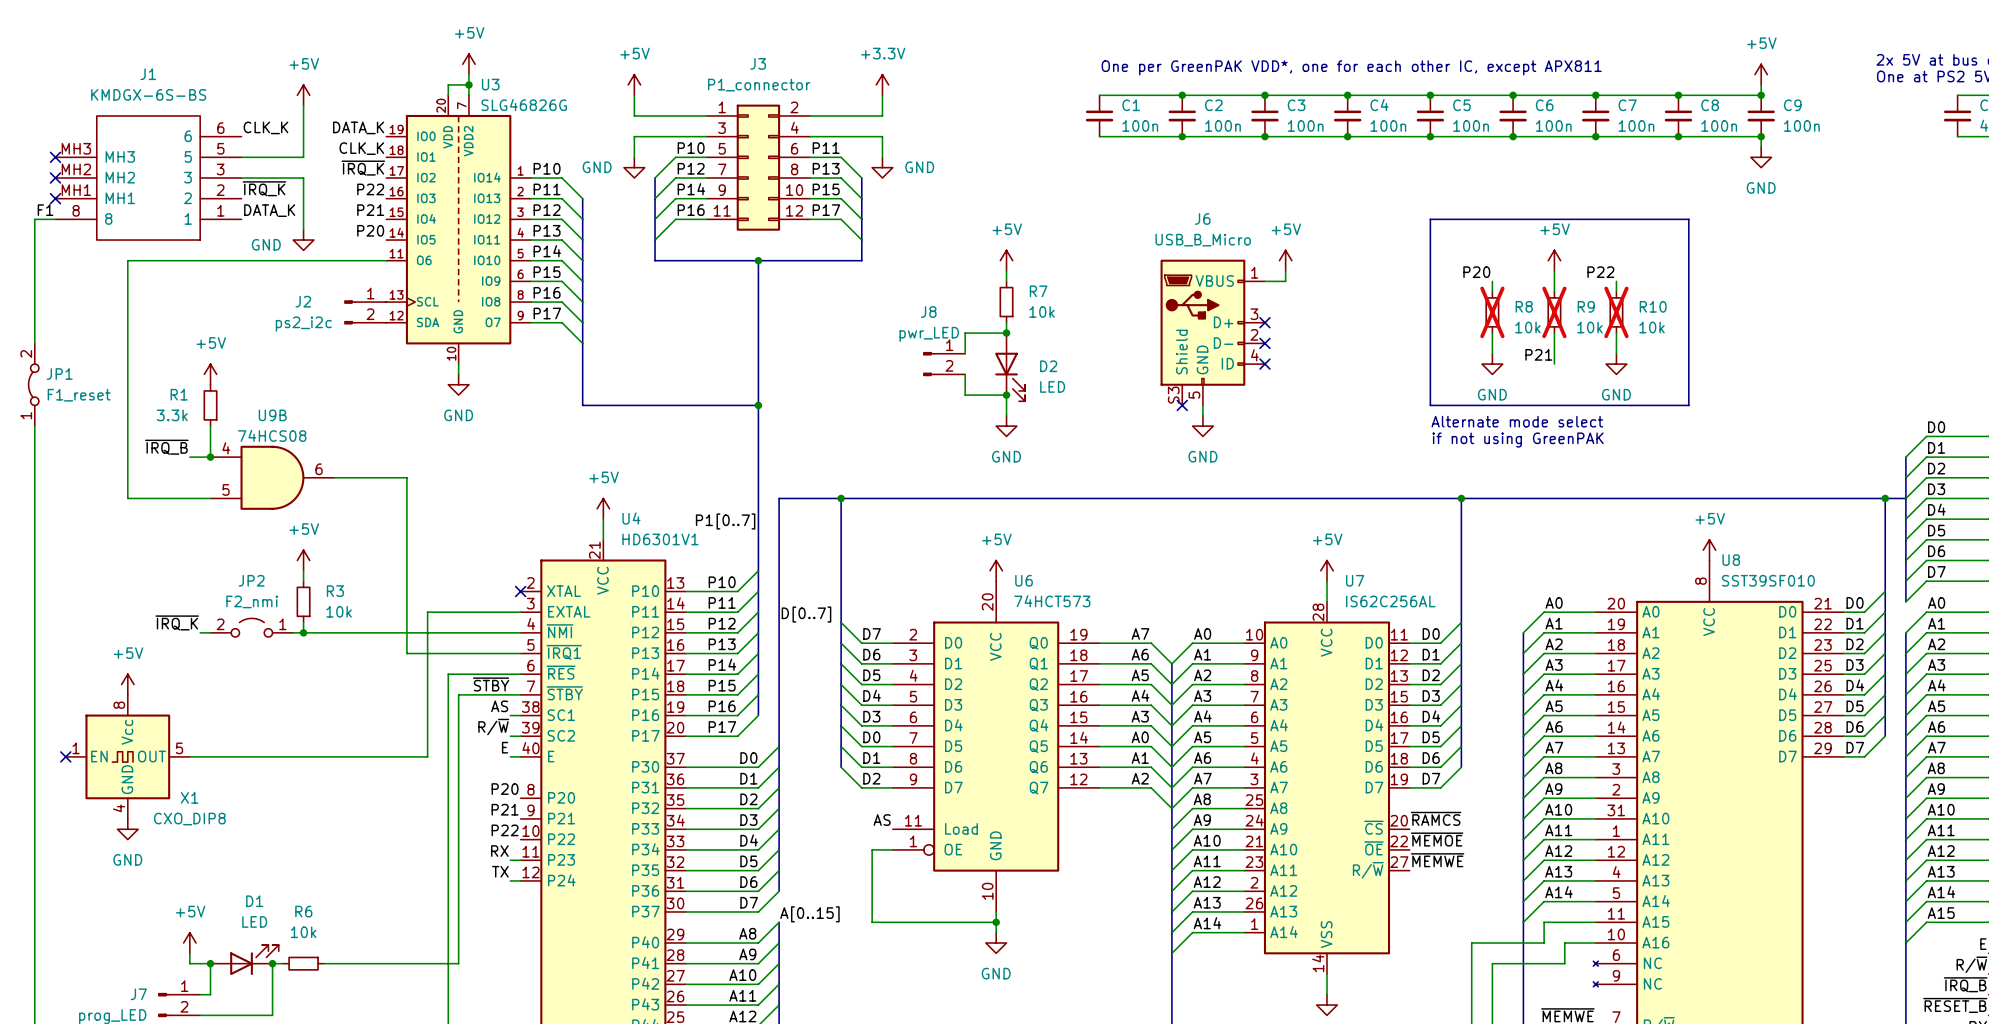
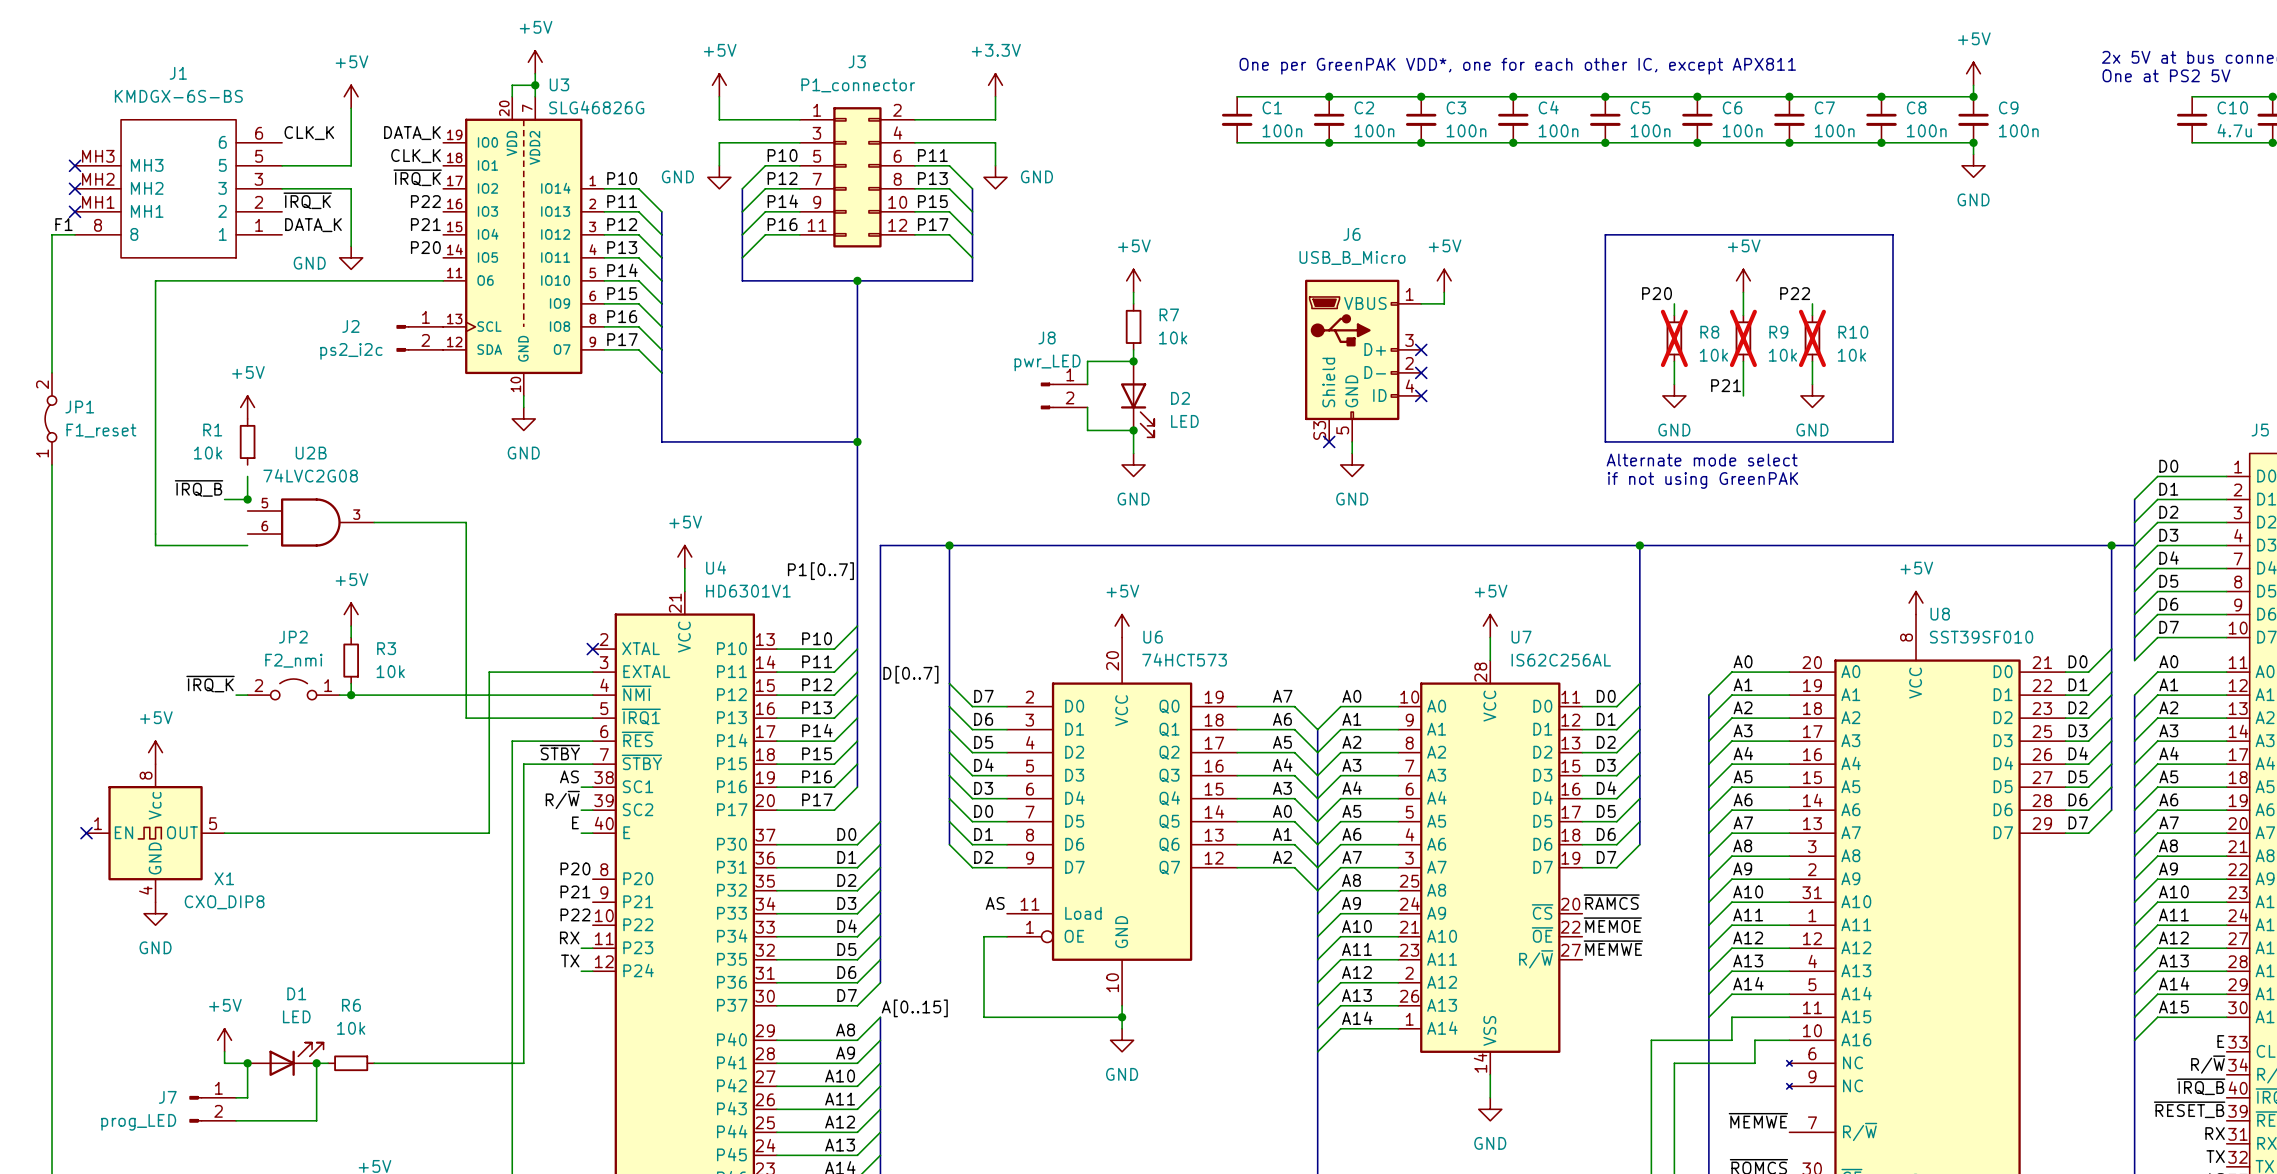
R1 value: 3.3k (172, 415) -> 10k (208, 453)
wire: (210, 426) (210, 436) -> none
U2B: none -> 74LVC2G08 (310, 522)
U9B: 74HCS08 (272, 477) -> none

